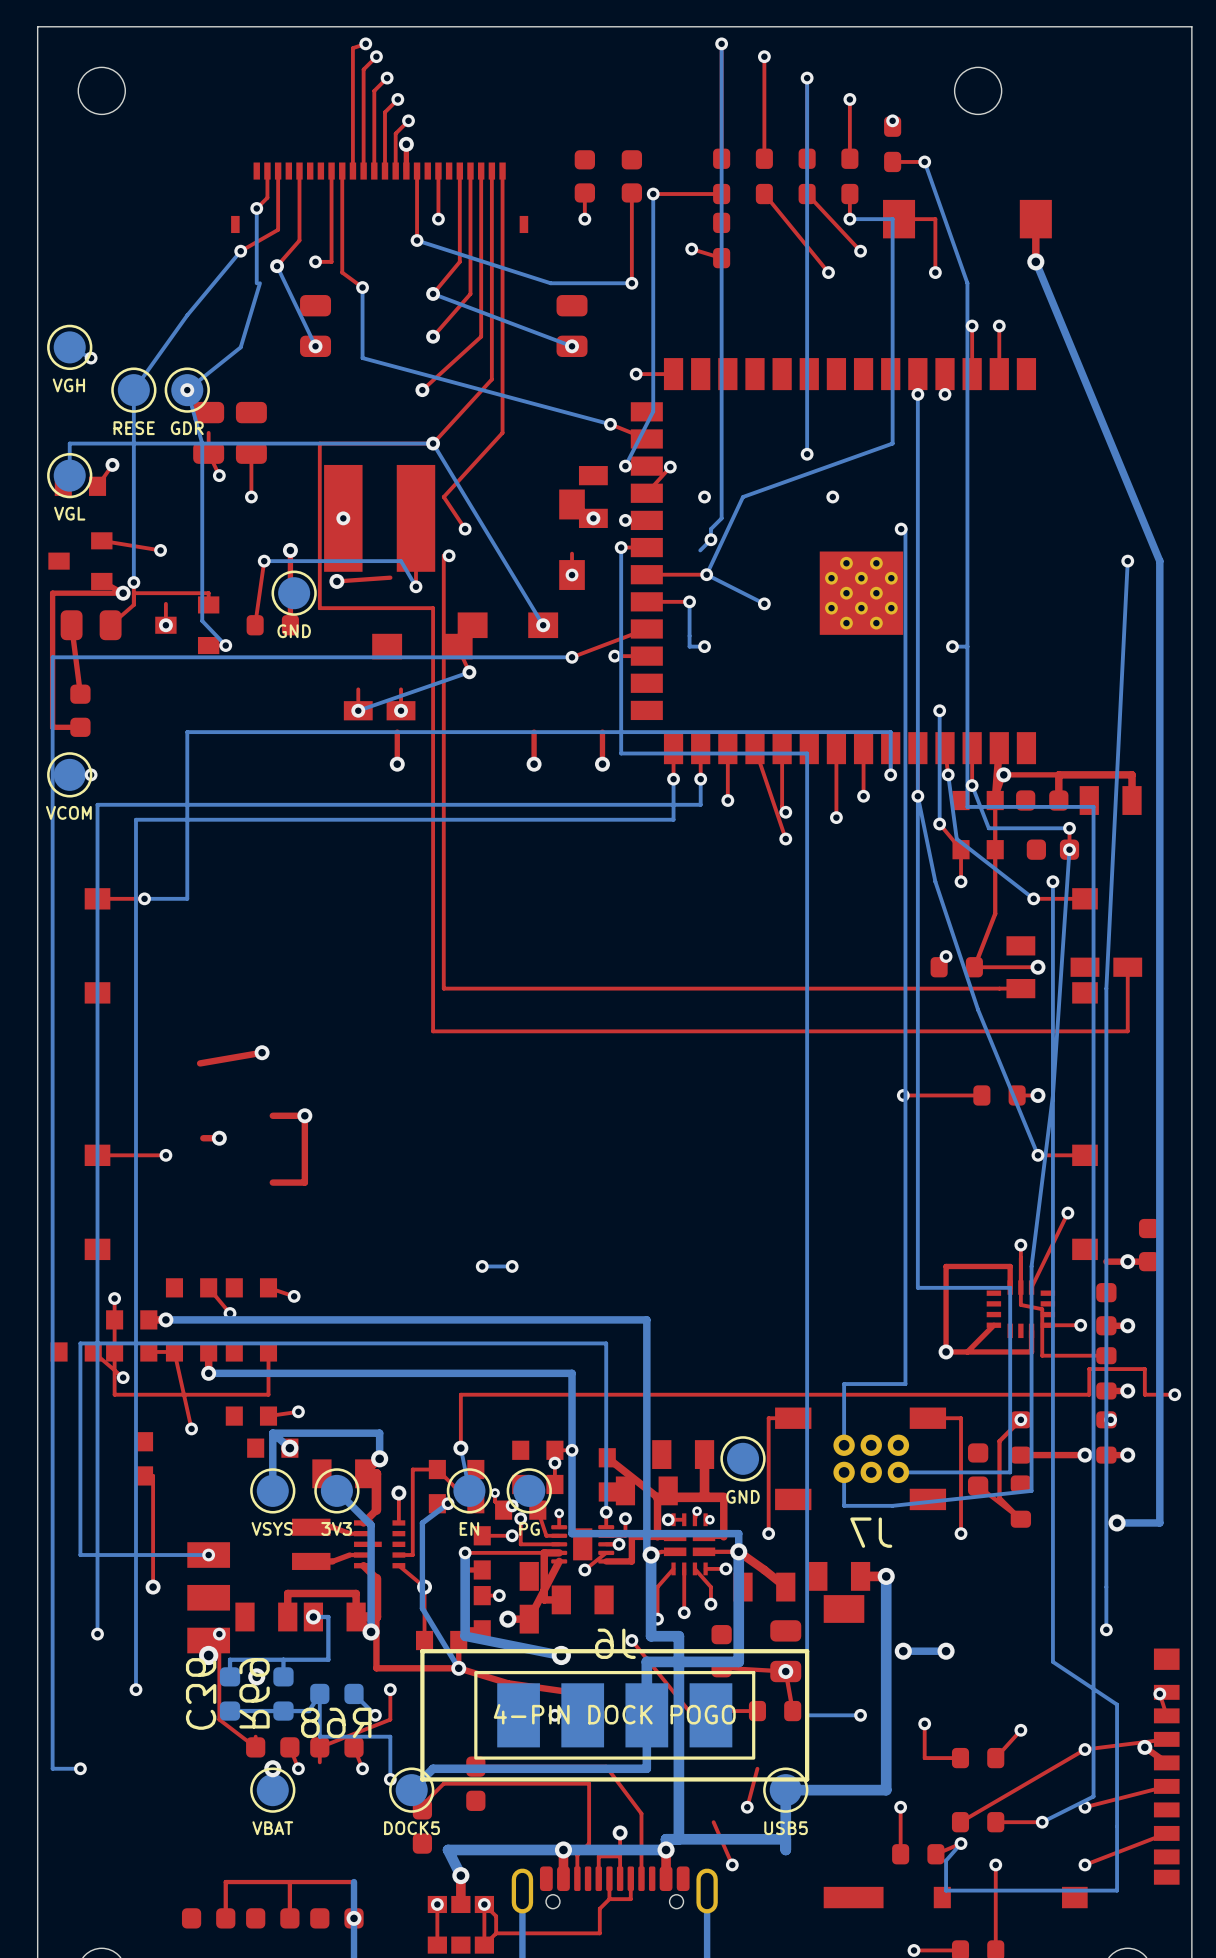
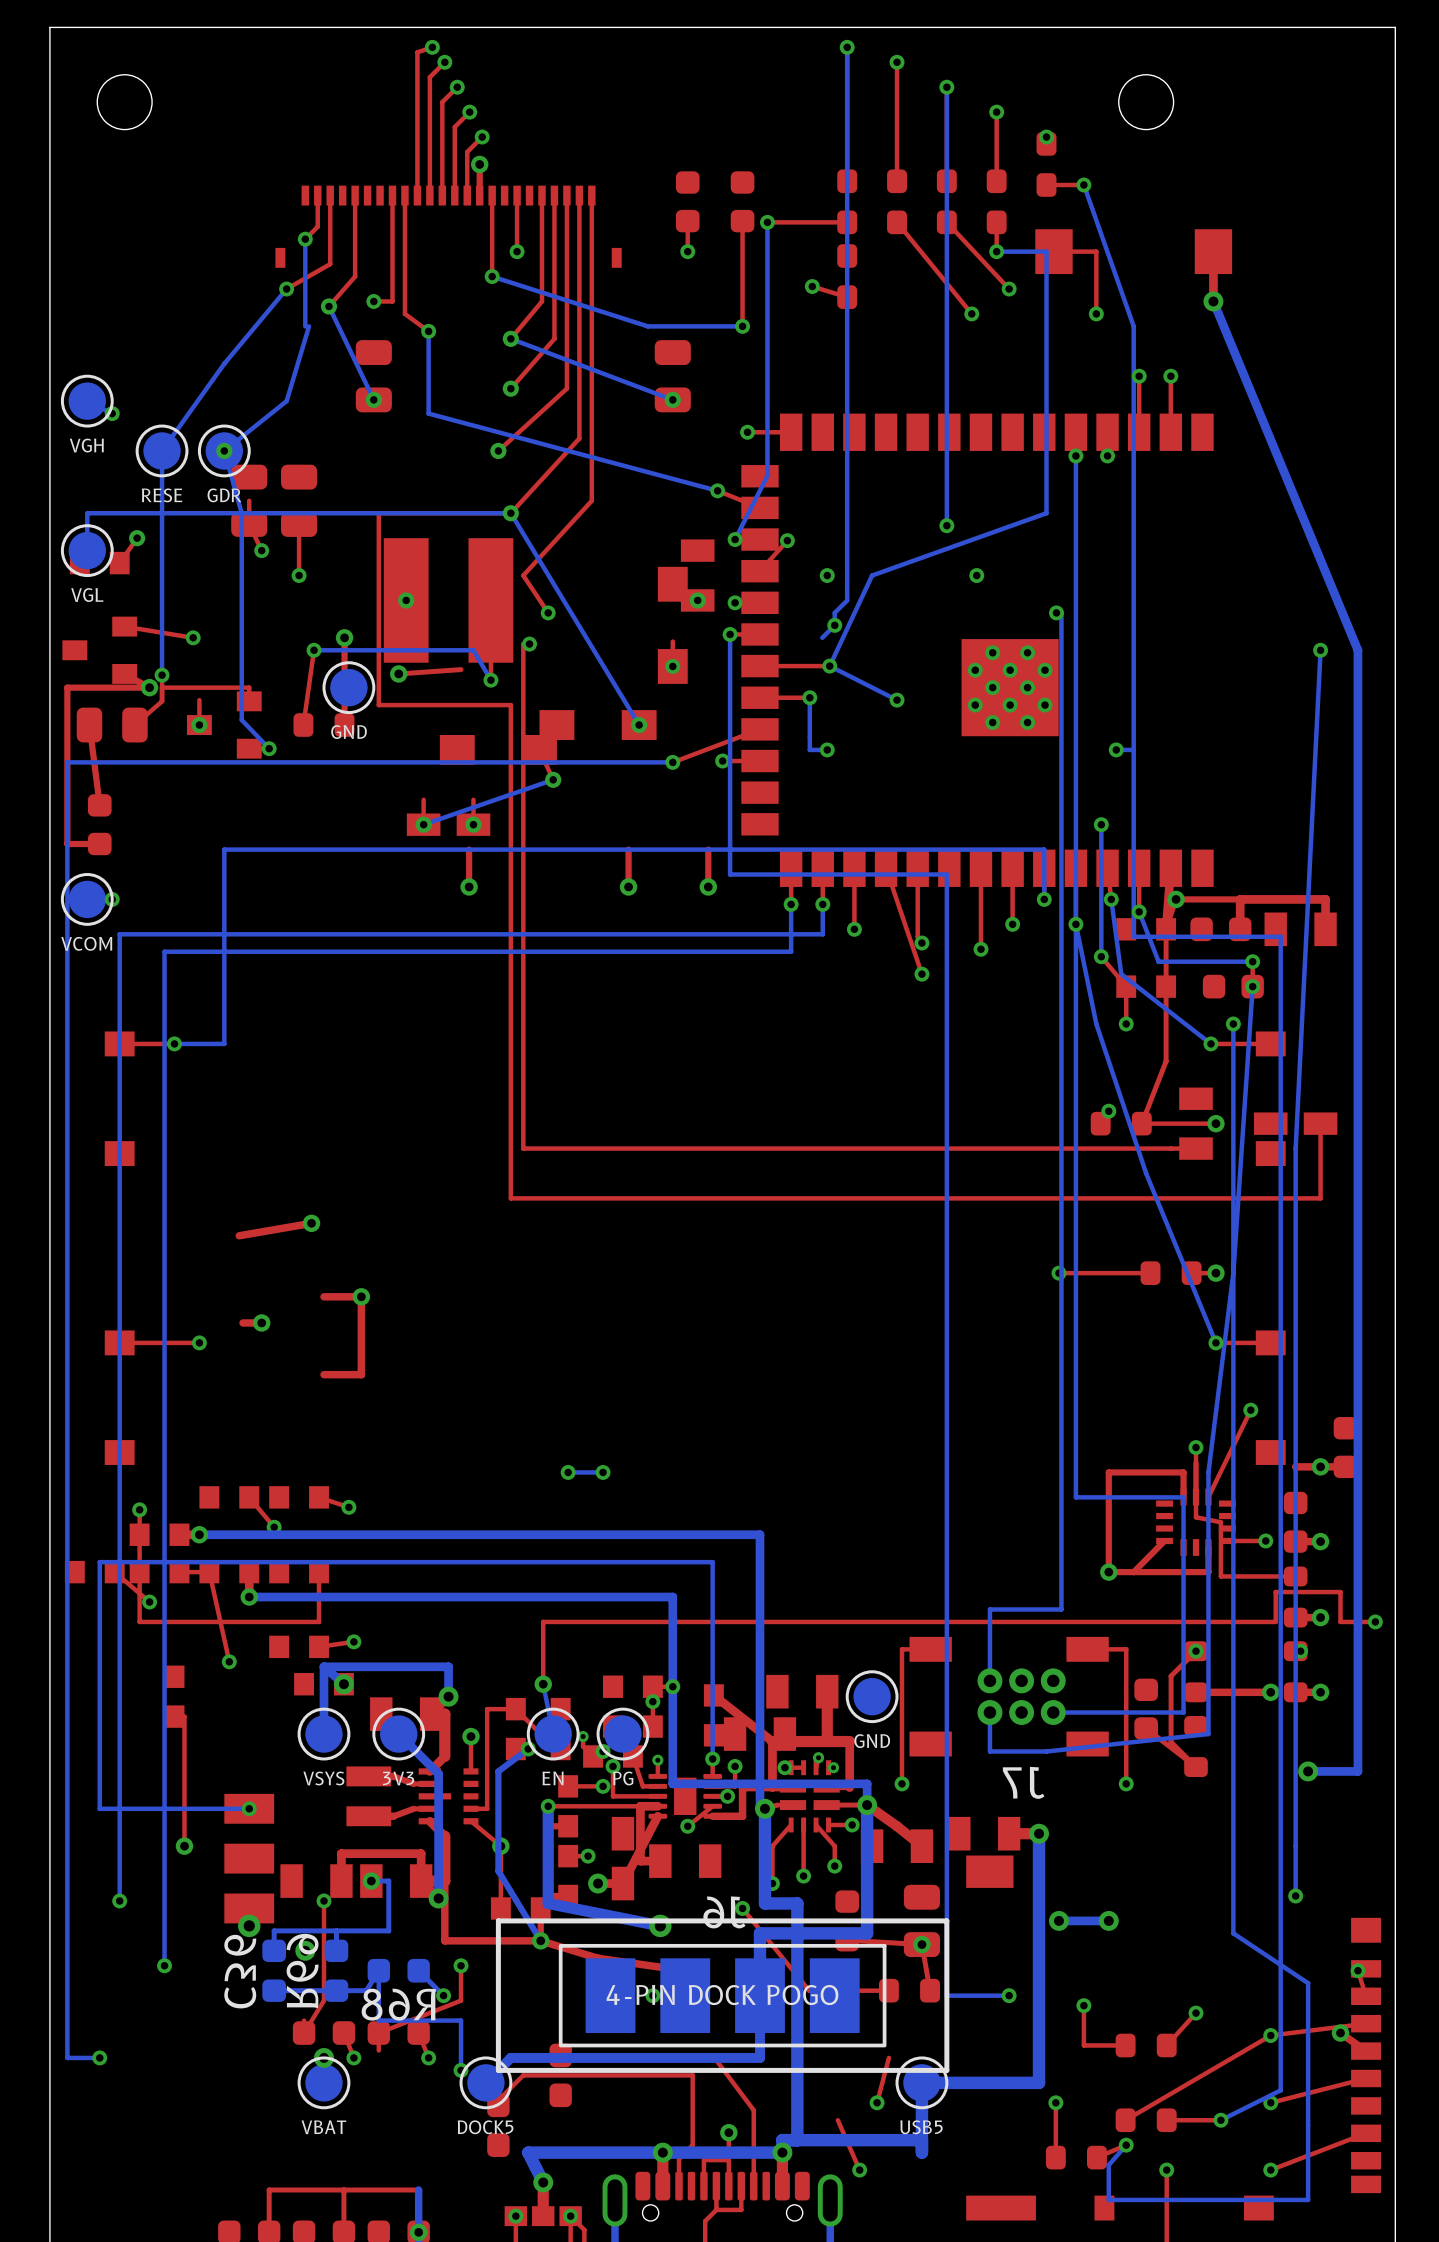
top track: (219, 1634) (219, 1719) (255, 1747) -> (323, 1900) (323, 2000) (304, 2033)
via position: (219, 1634) -> (323, 1900)

